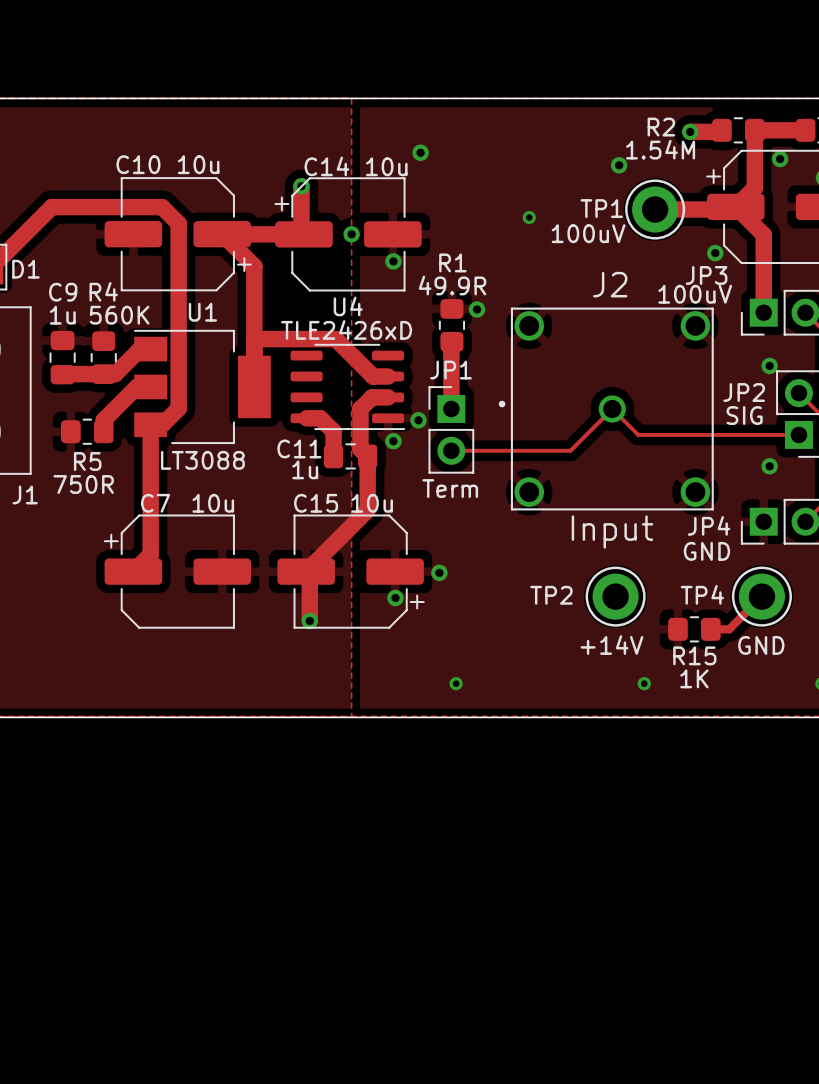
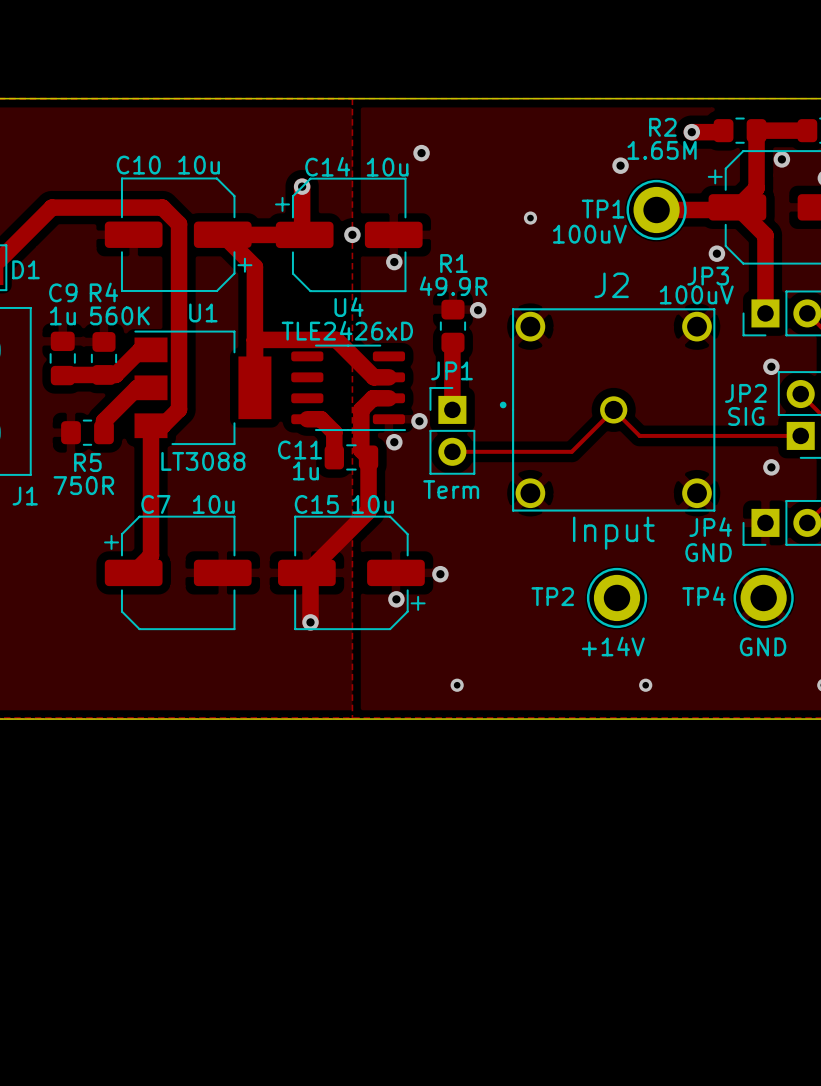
R2 value: 1.54M (660, 149) -> 1.65M (662, 150)
track: (761, 596) (729, 629) (710, 629) -> none
R15: 1K (694, 629) -> none

